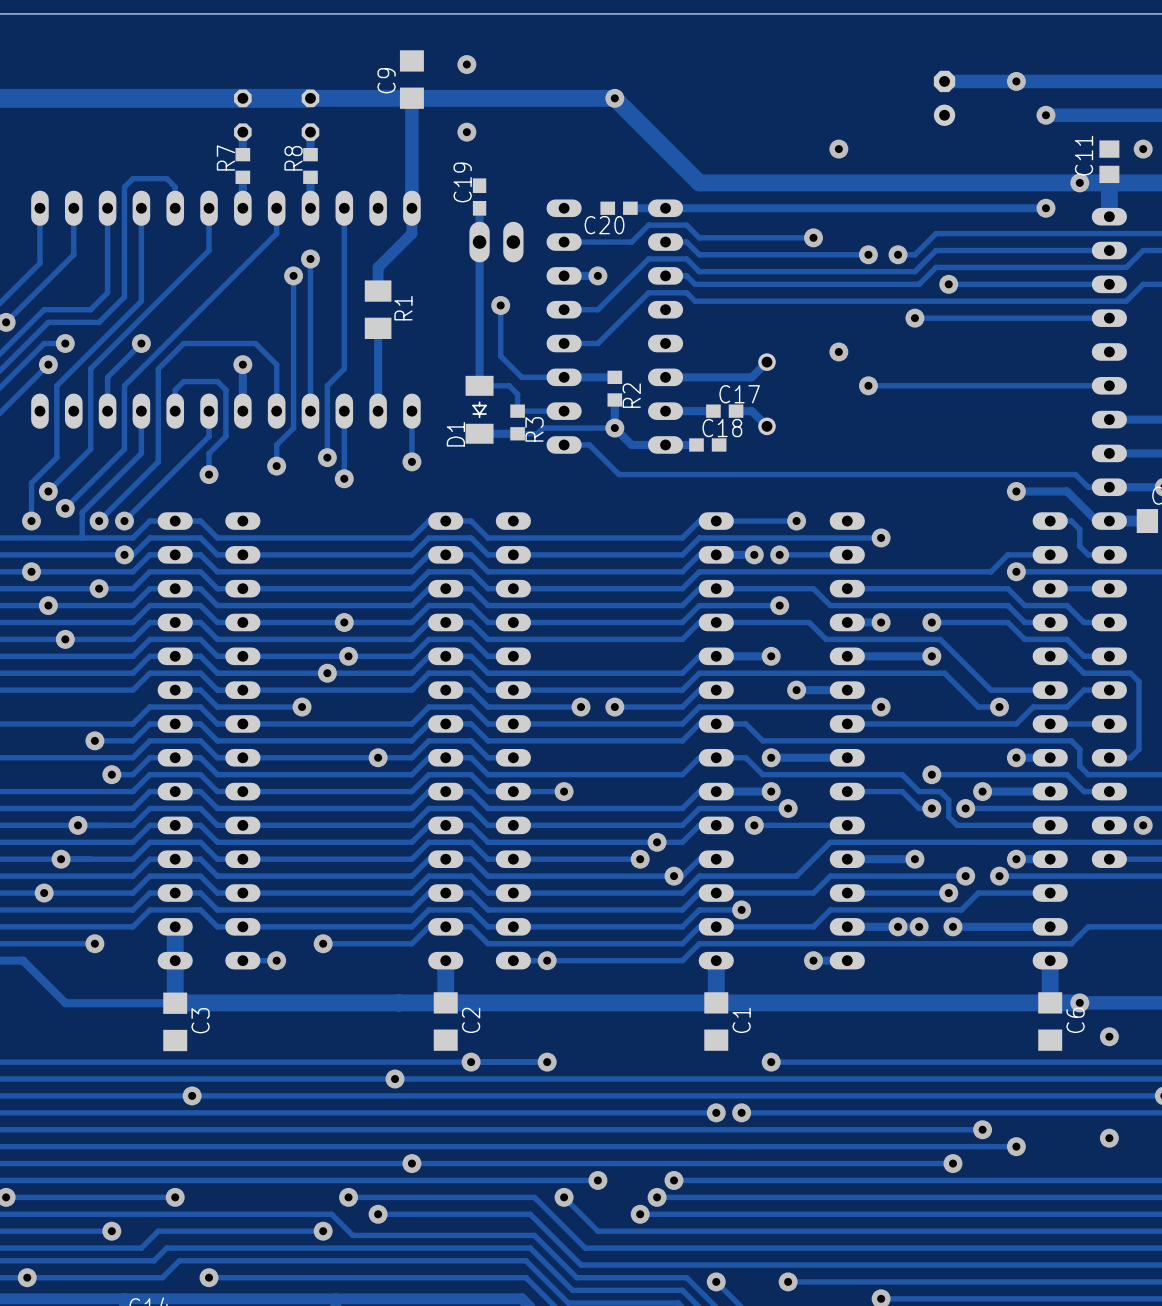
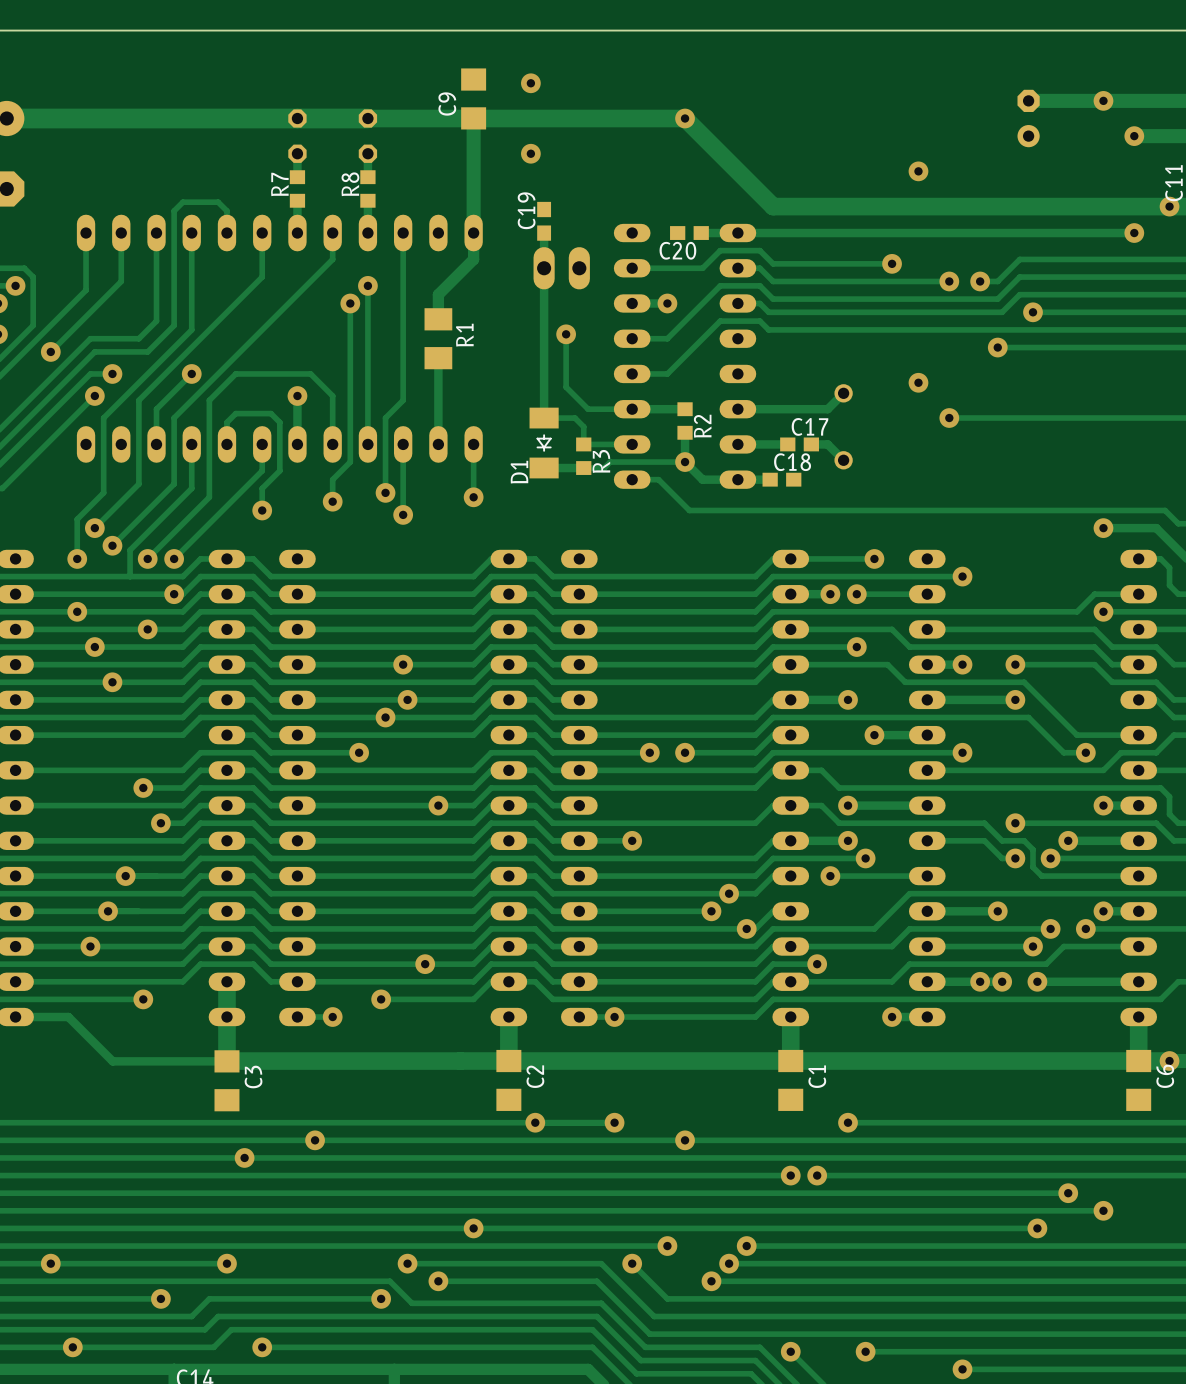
via: none -> (425, 964)
via: none -> (315, 1140)
via: (395, 1079) -> none
via: none -> (685, 1140)

